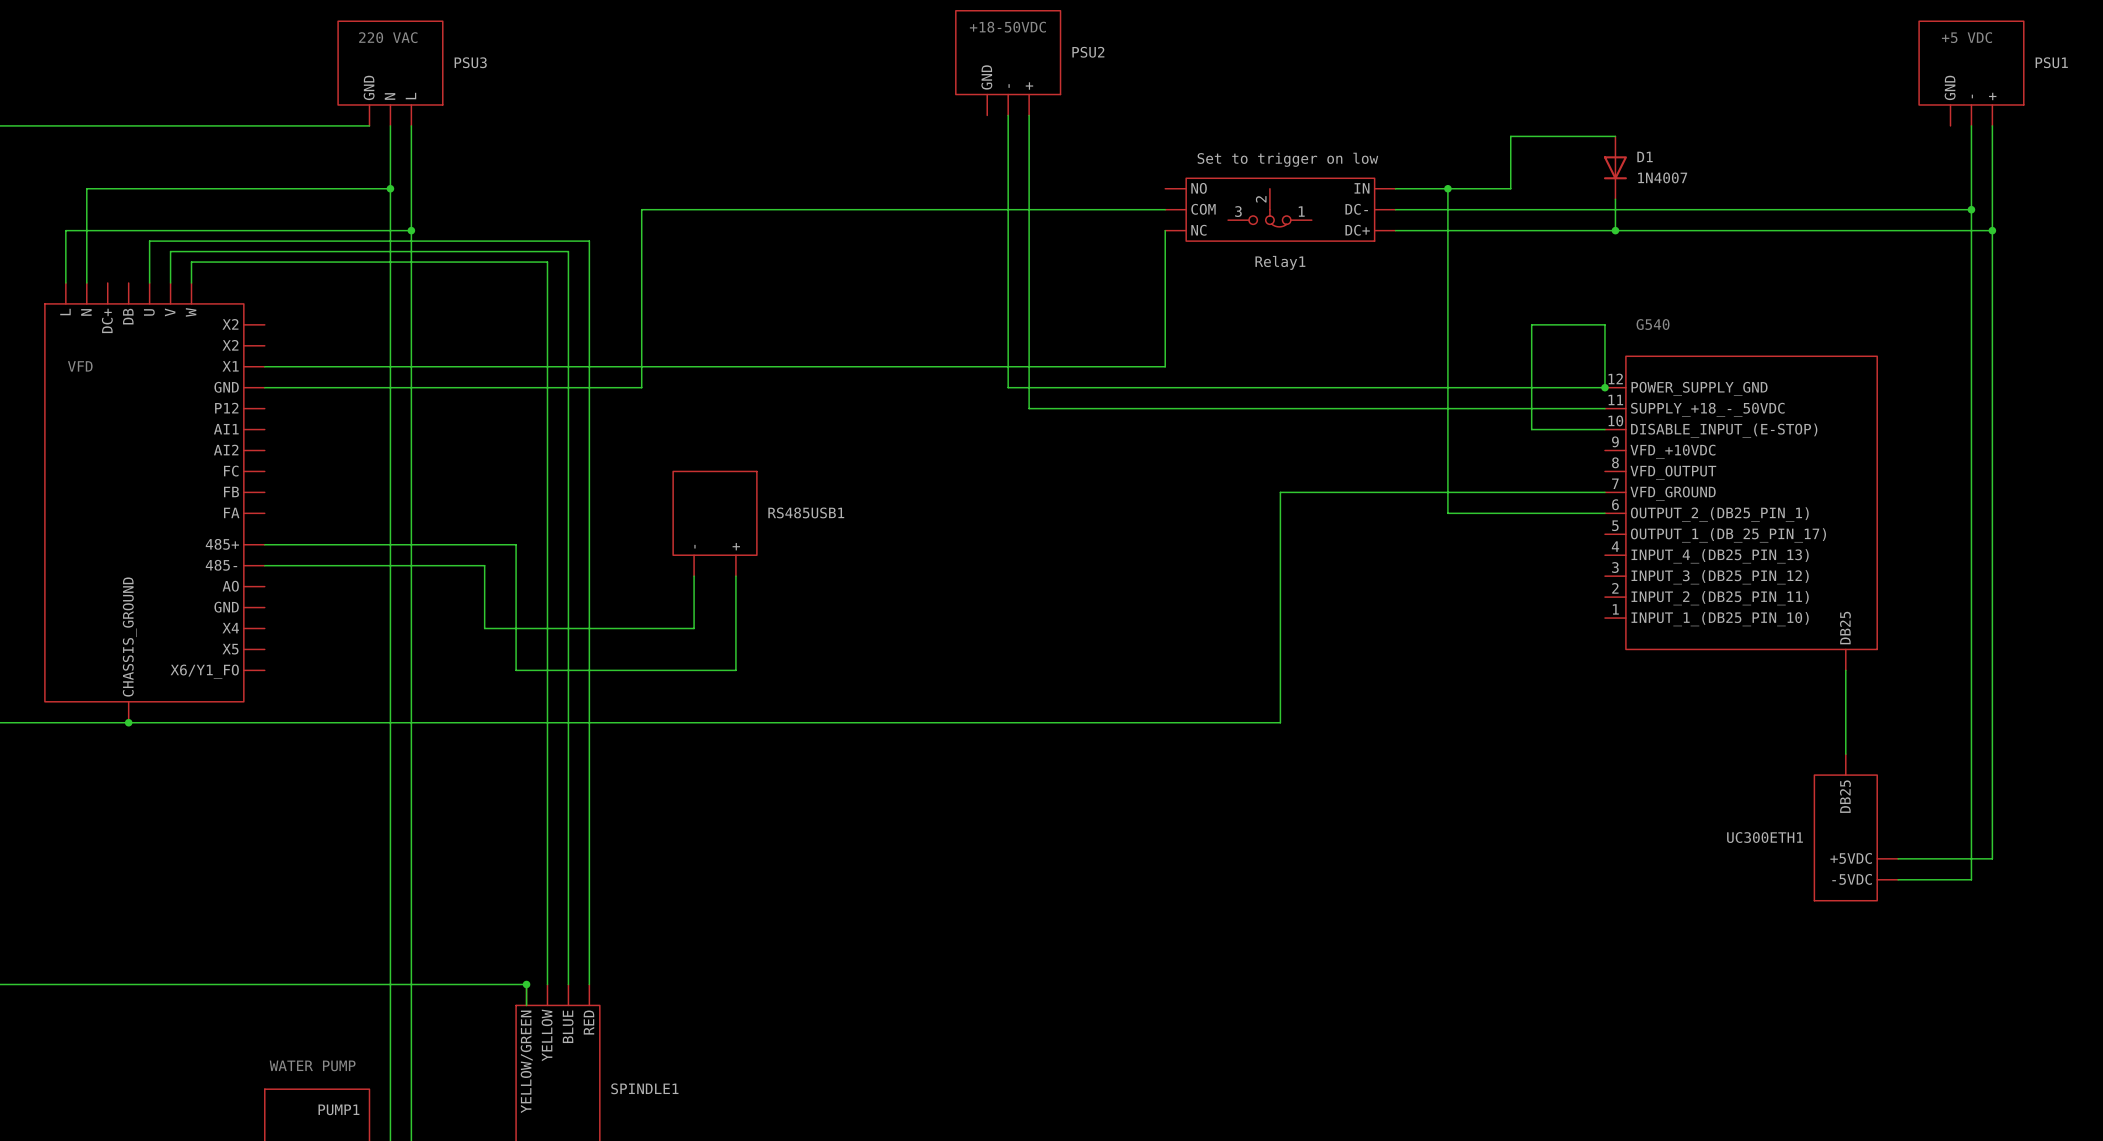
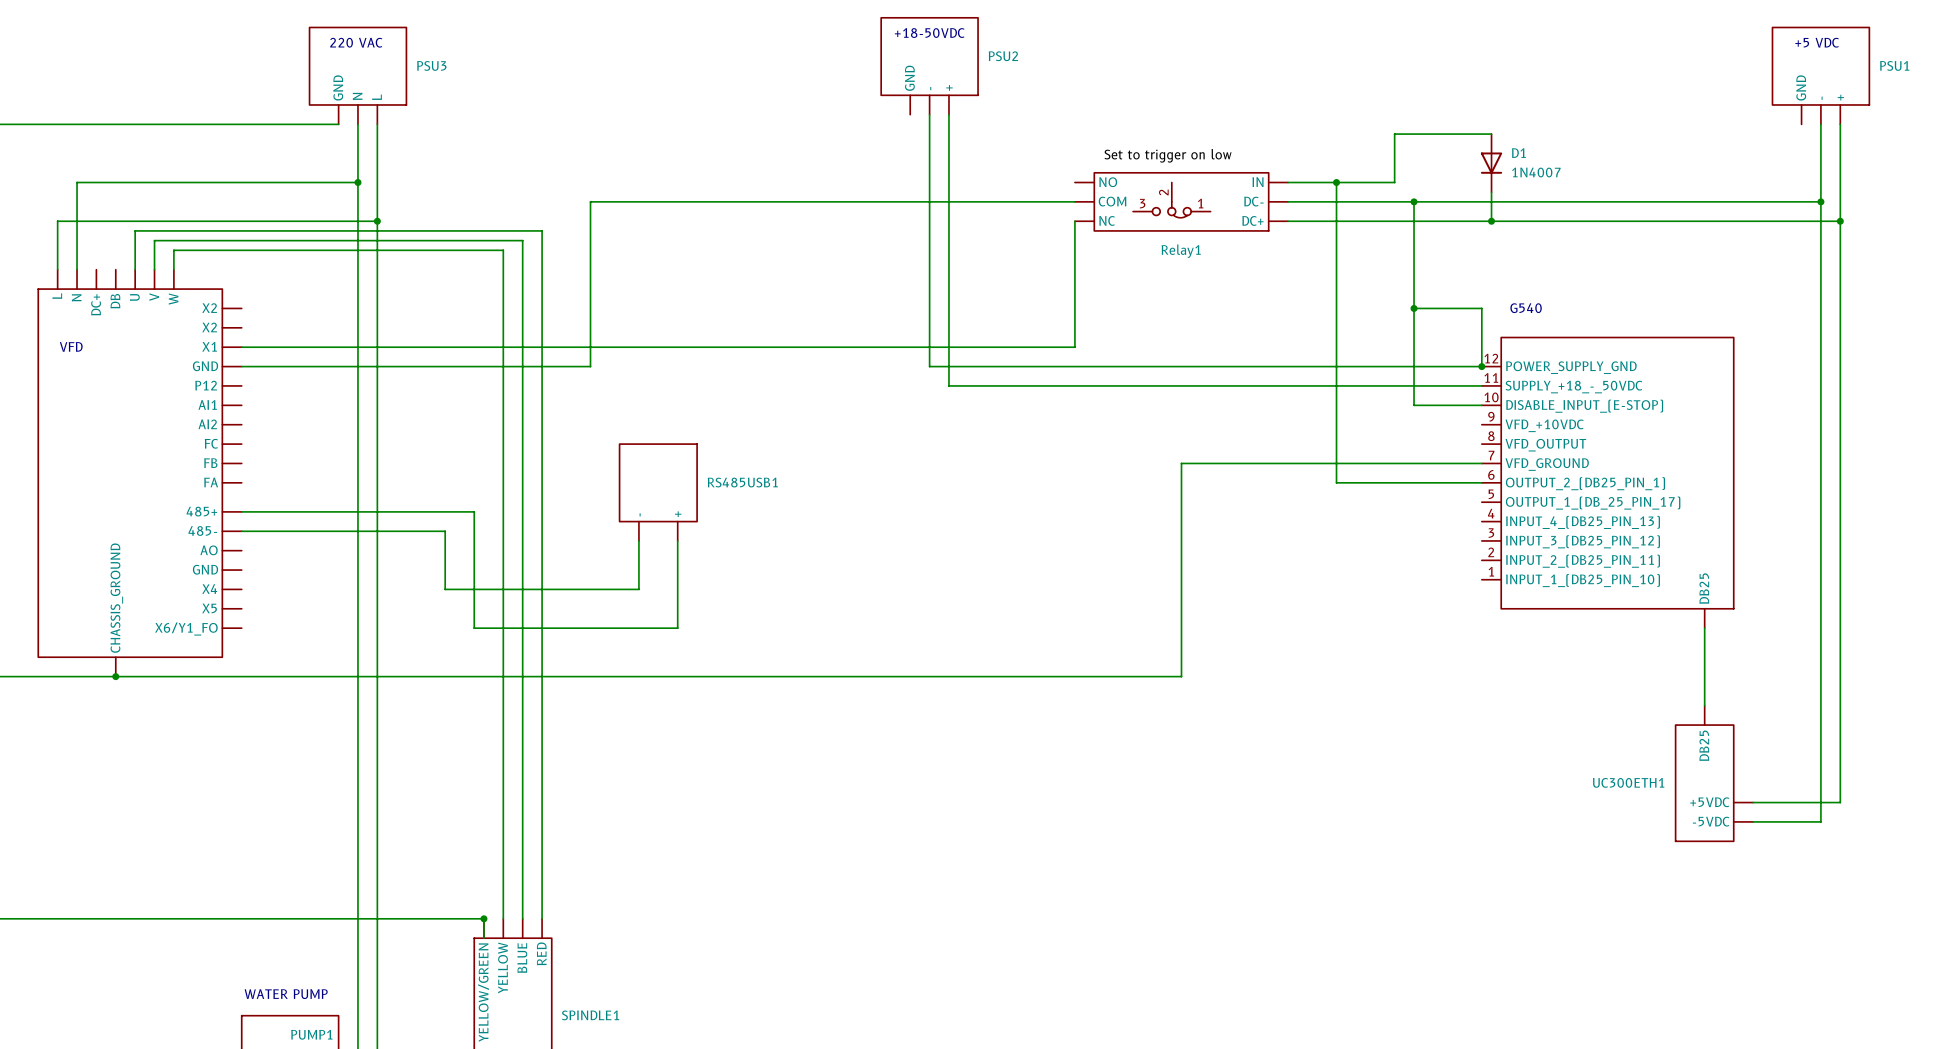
wire: none -> (1414, 201) (1414, 308)
junction: none -> (1414, 201)
junction: none -> (1414, 308)

